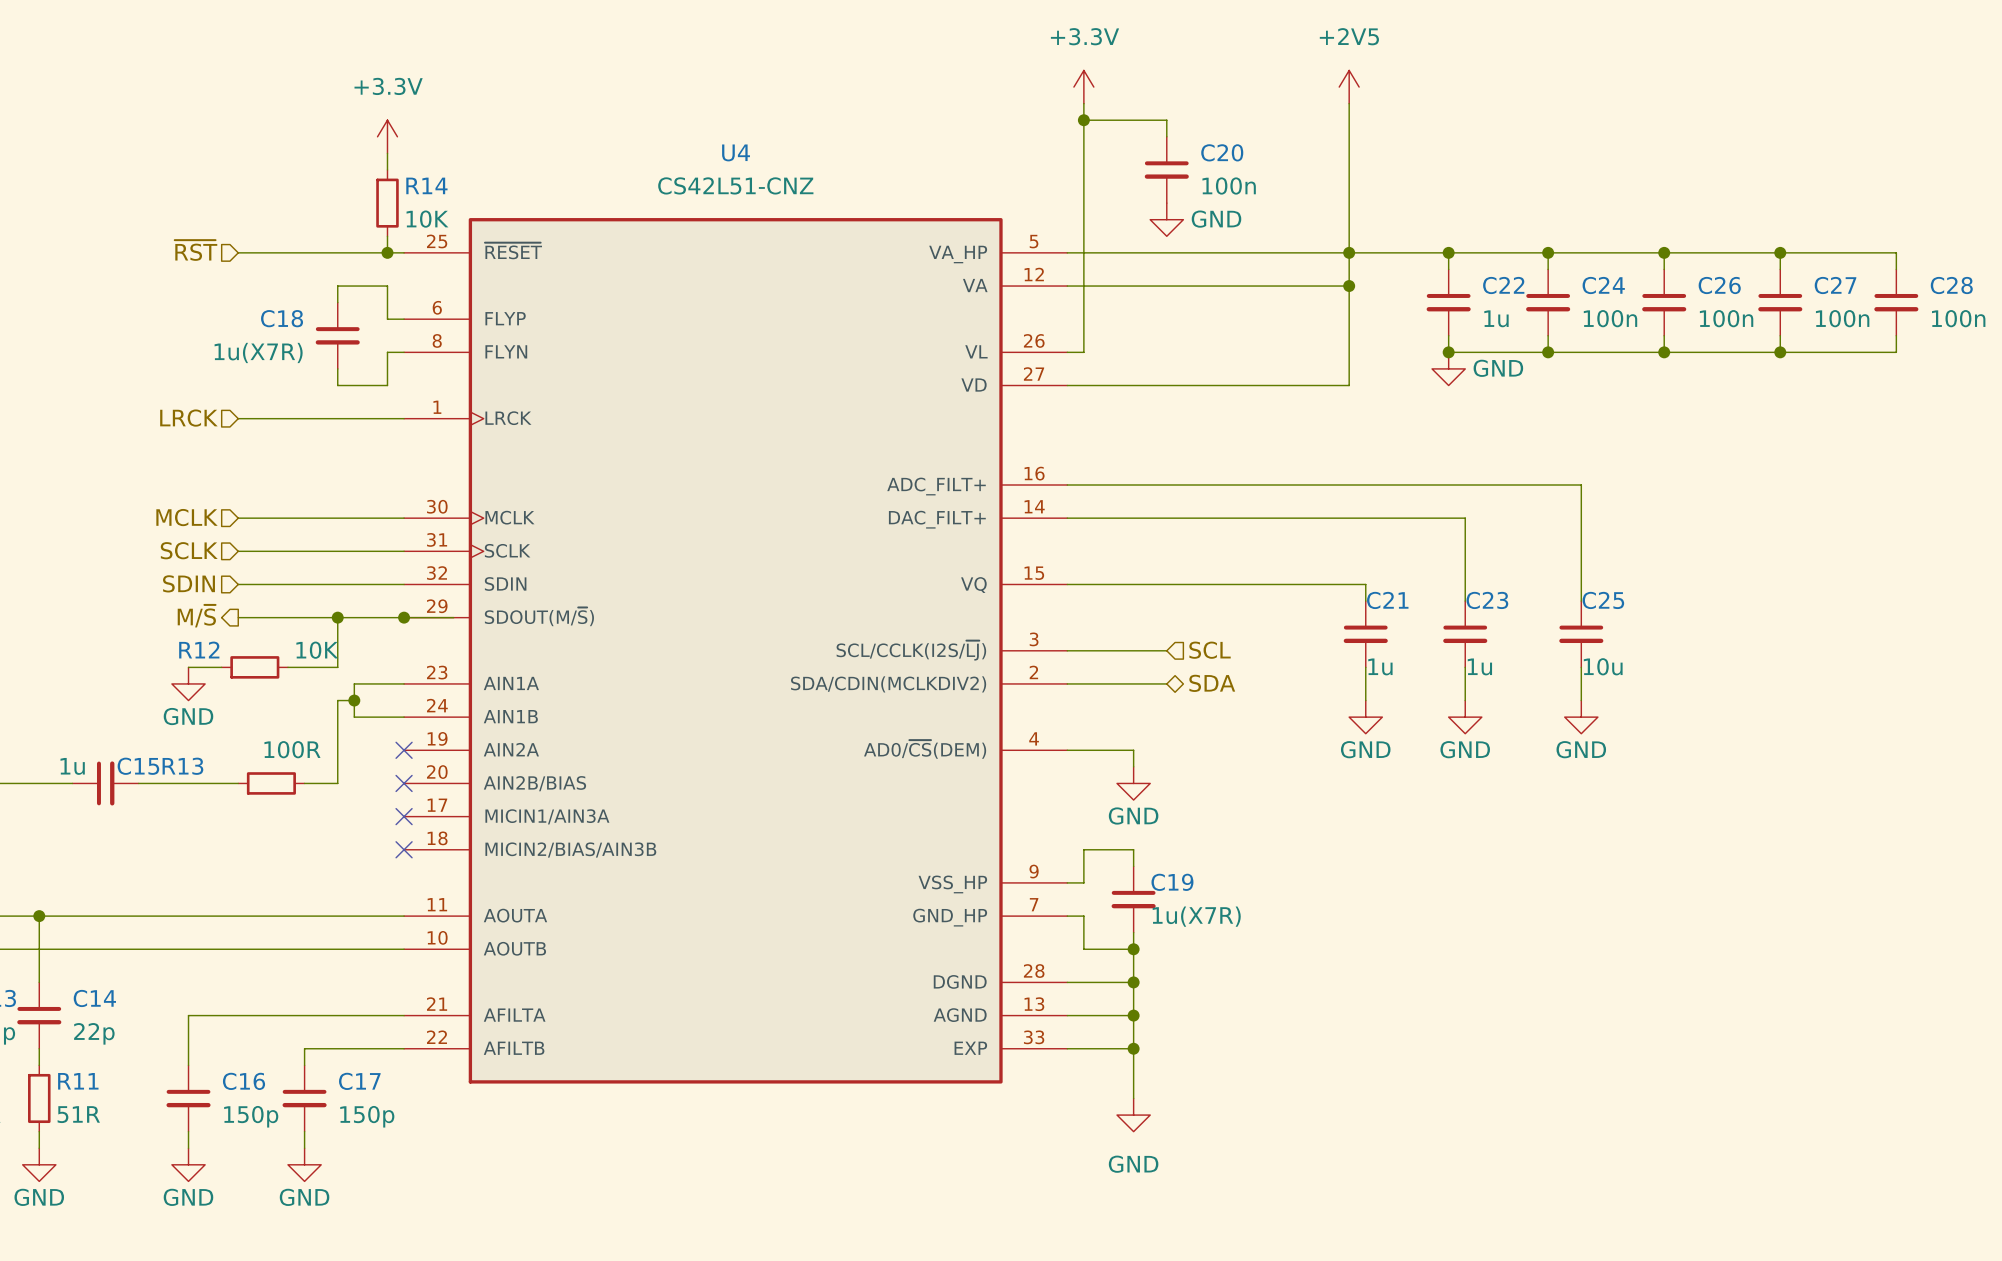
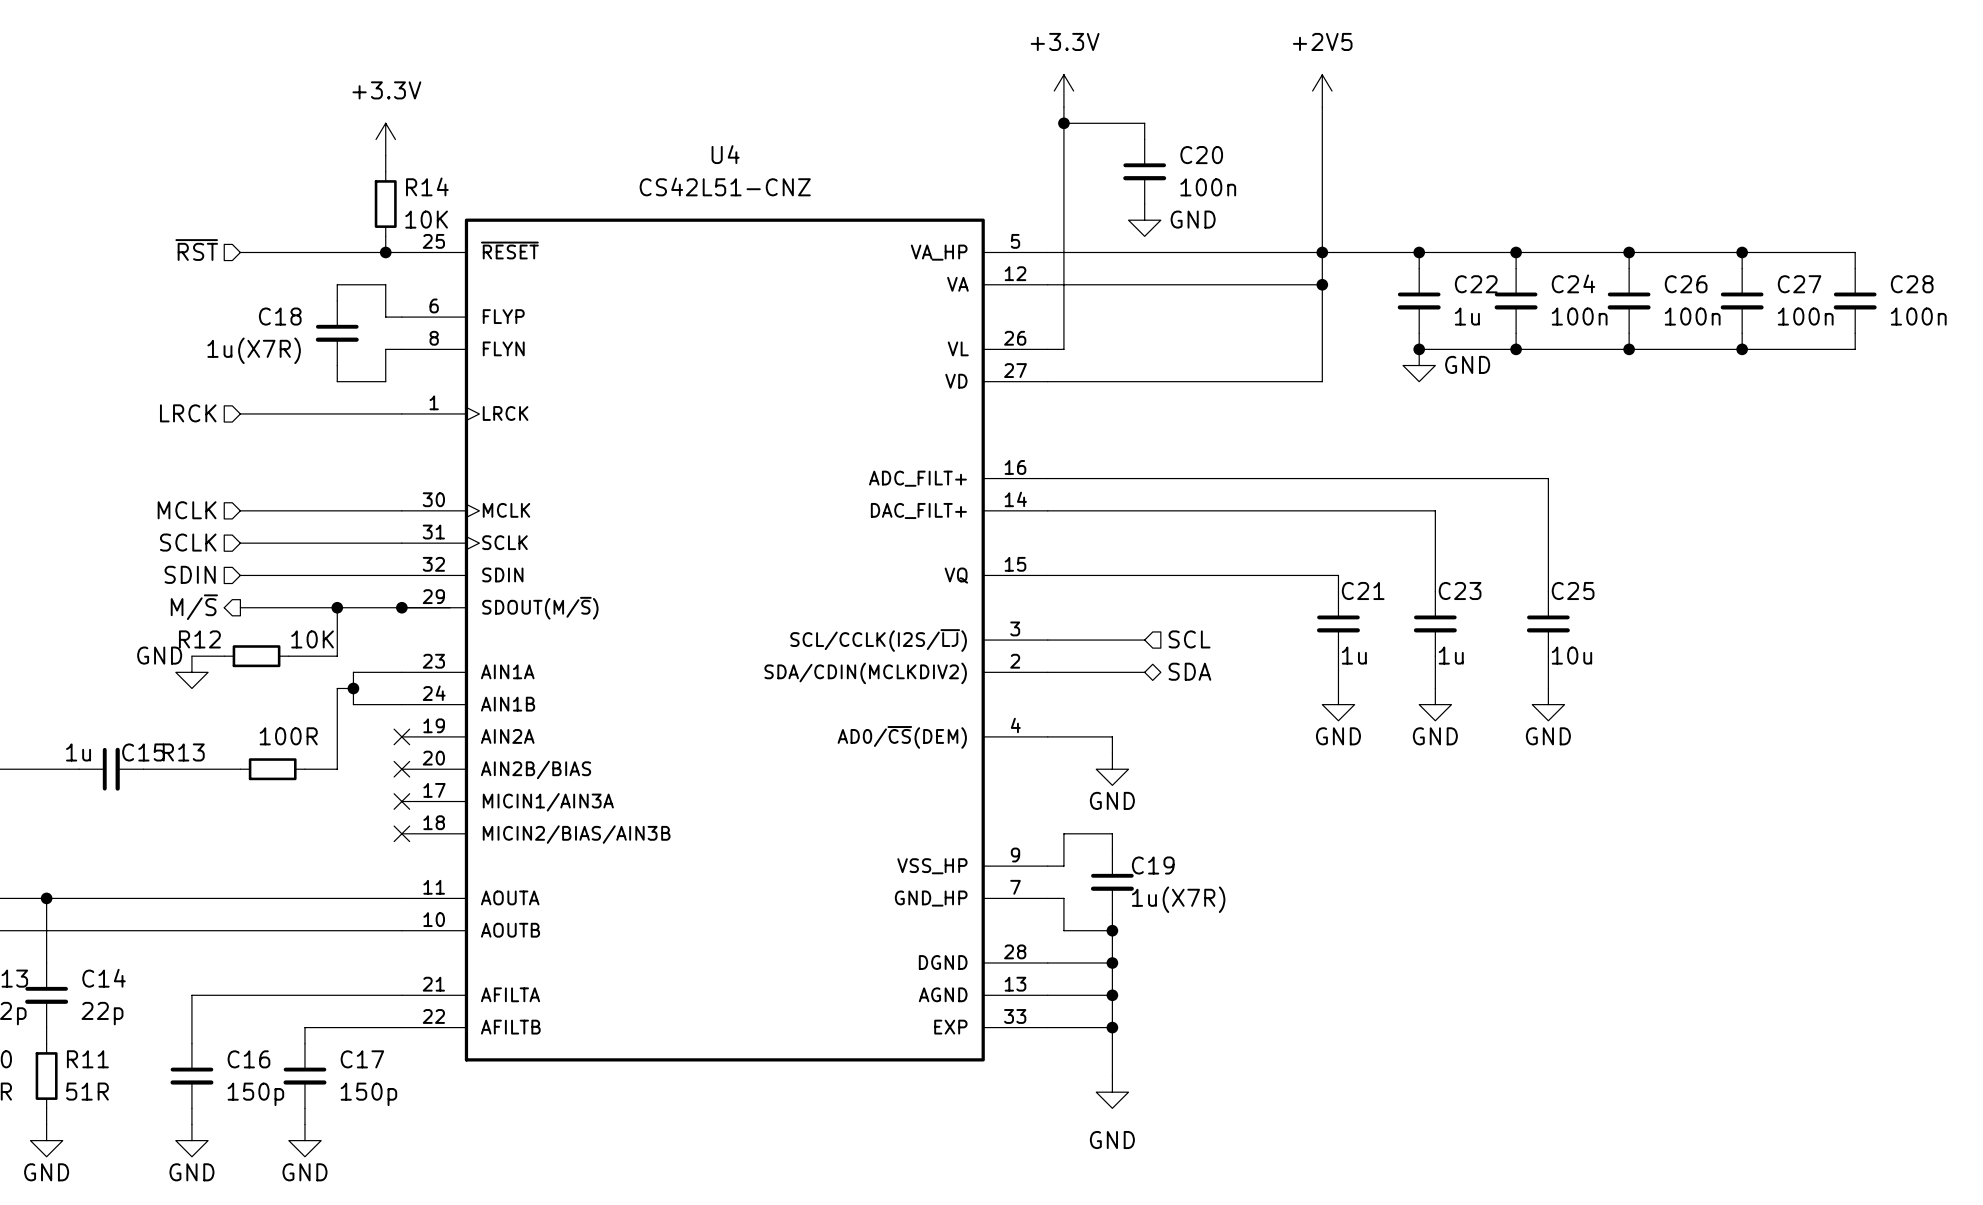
power symbol text position: GND (188, 716) -> GND (159, 655)

